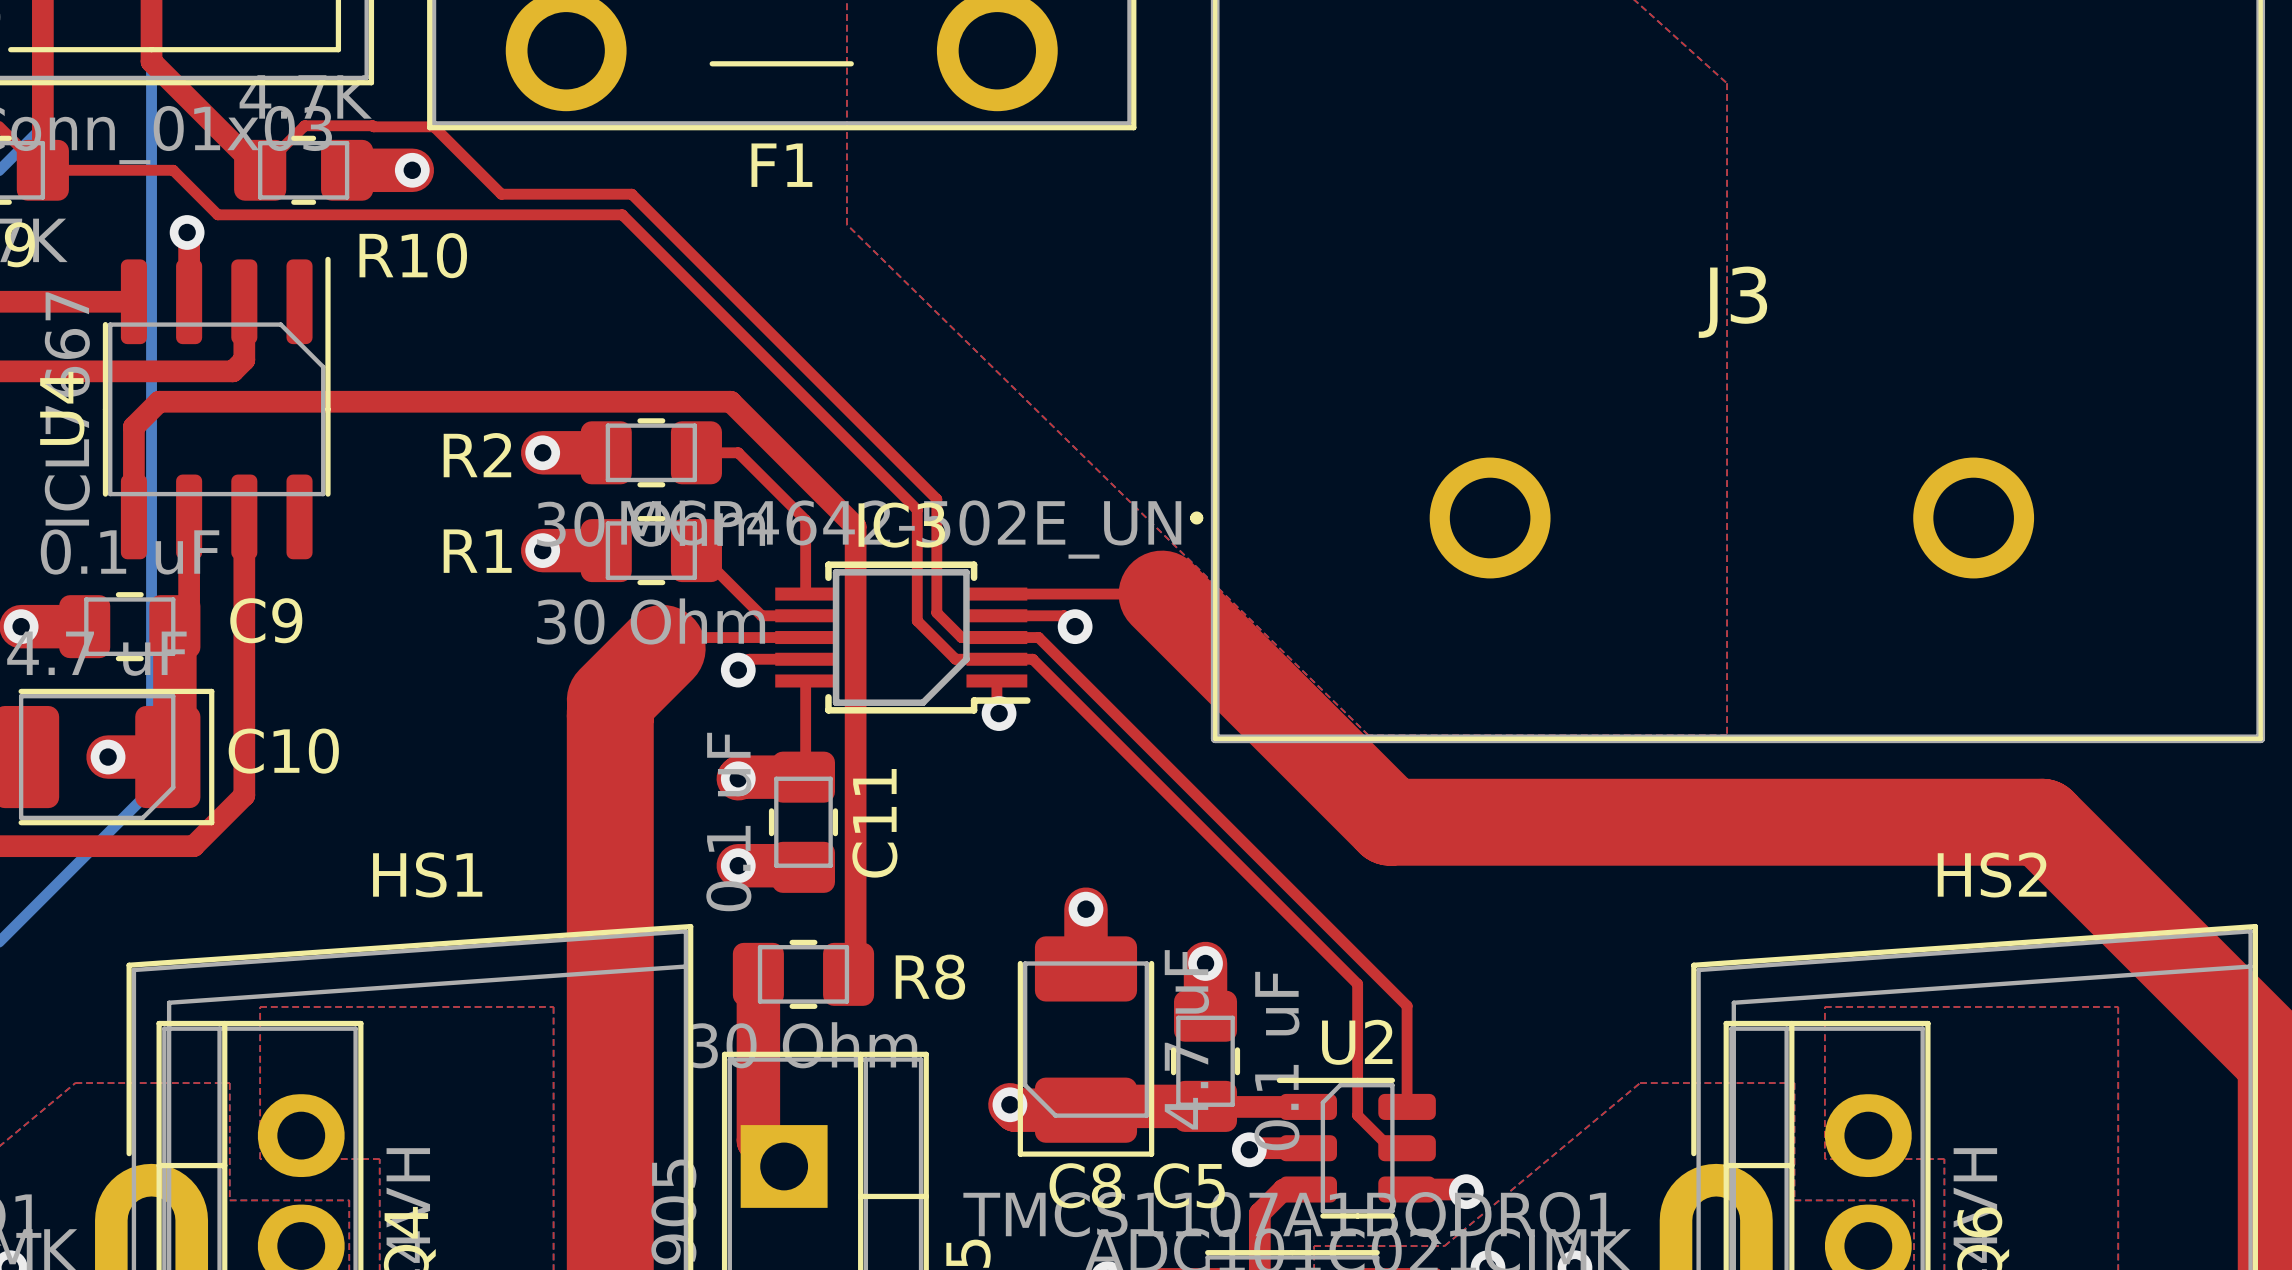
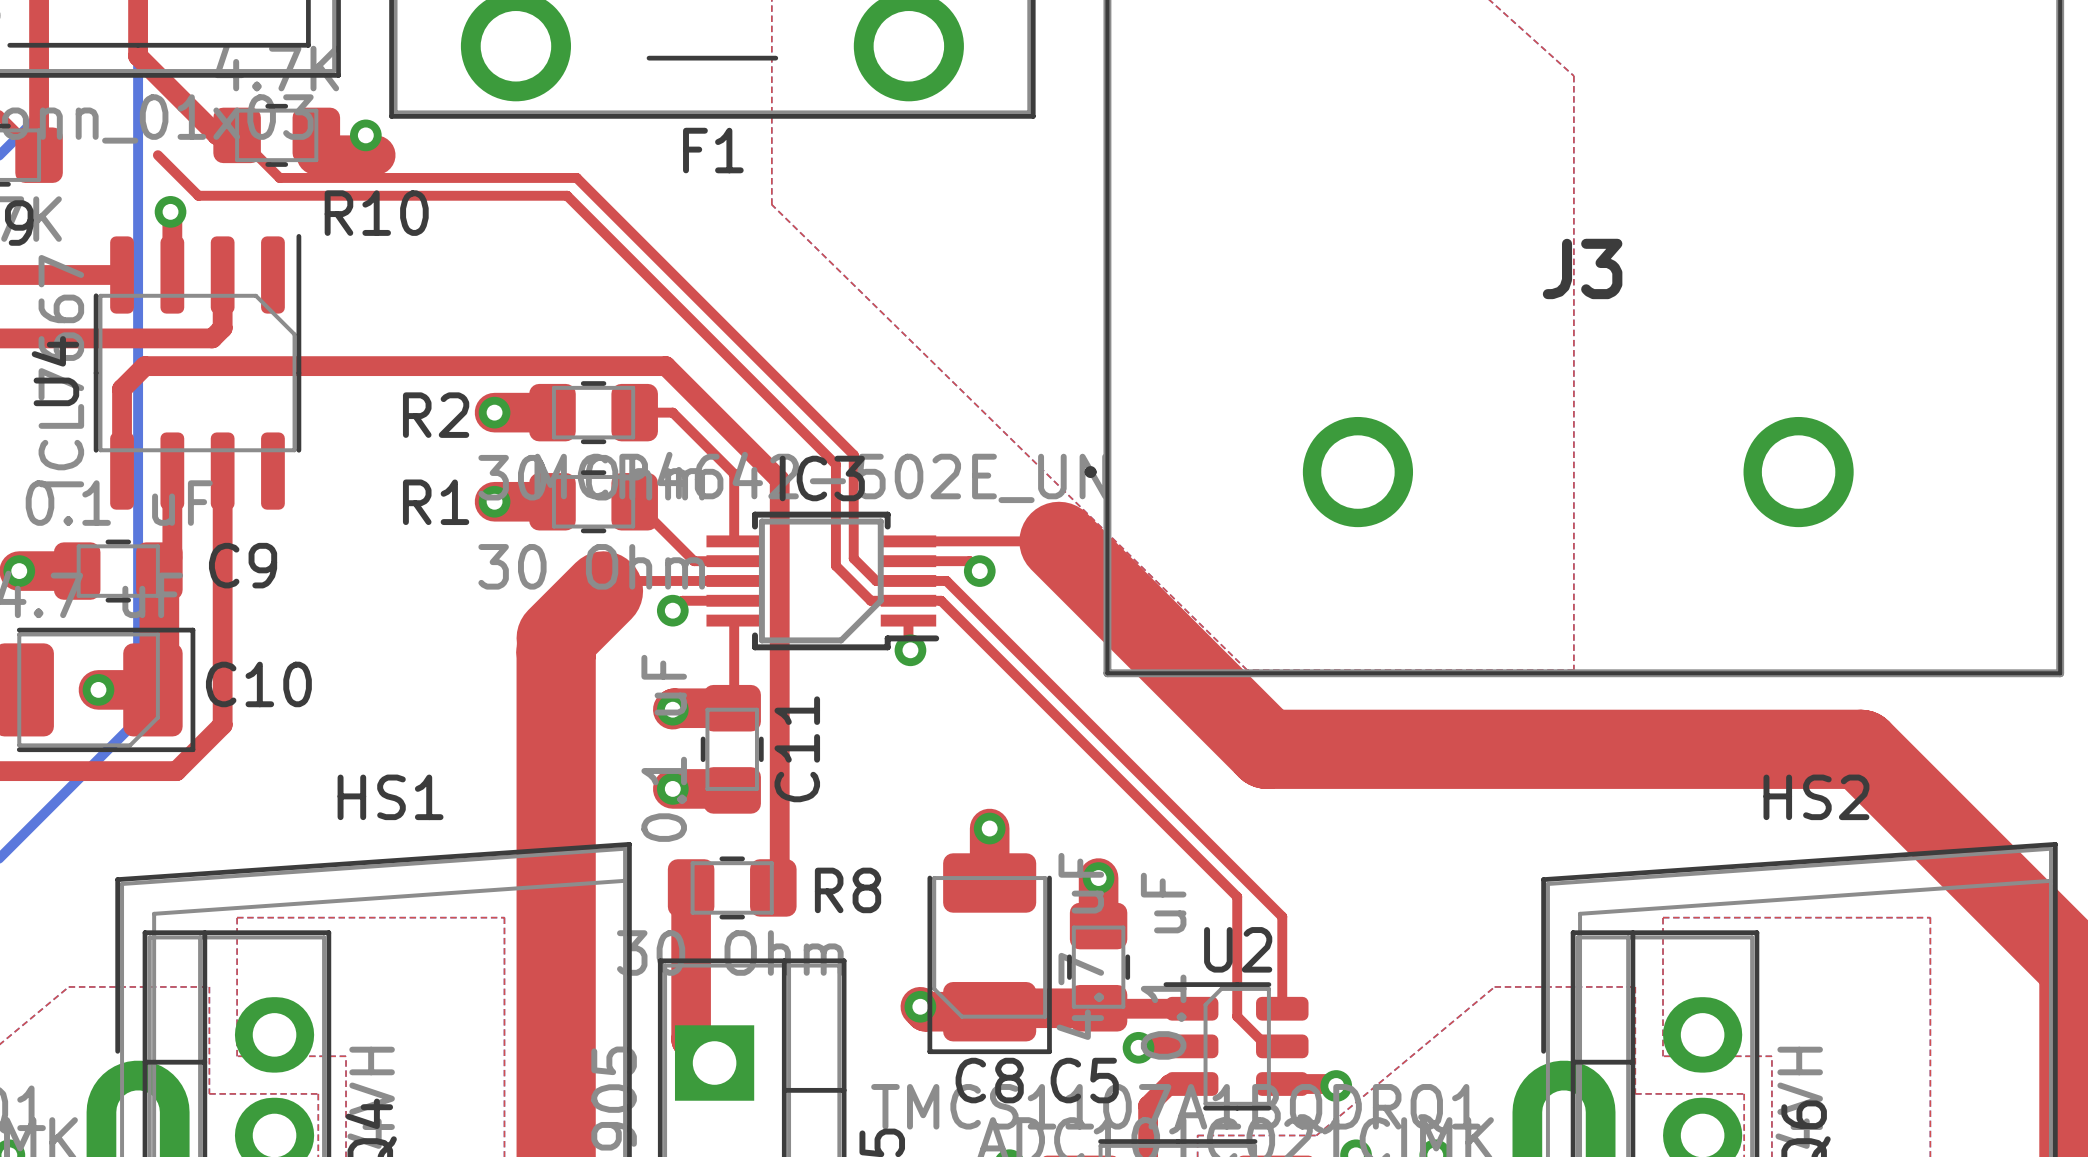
top track: (42, 148) (42, 170) (173, 170) -> none
top track: (238, 148) (260, 170) (304, 125) (434, 126) (501, 194) (632, 195) -> (217, 135) (237, 135) (279, 177) (576, 177)
R10 position: (303, 170) -> (276, 135)
via position: (412, 170) -> (365, 135)

